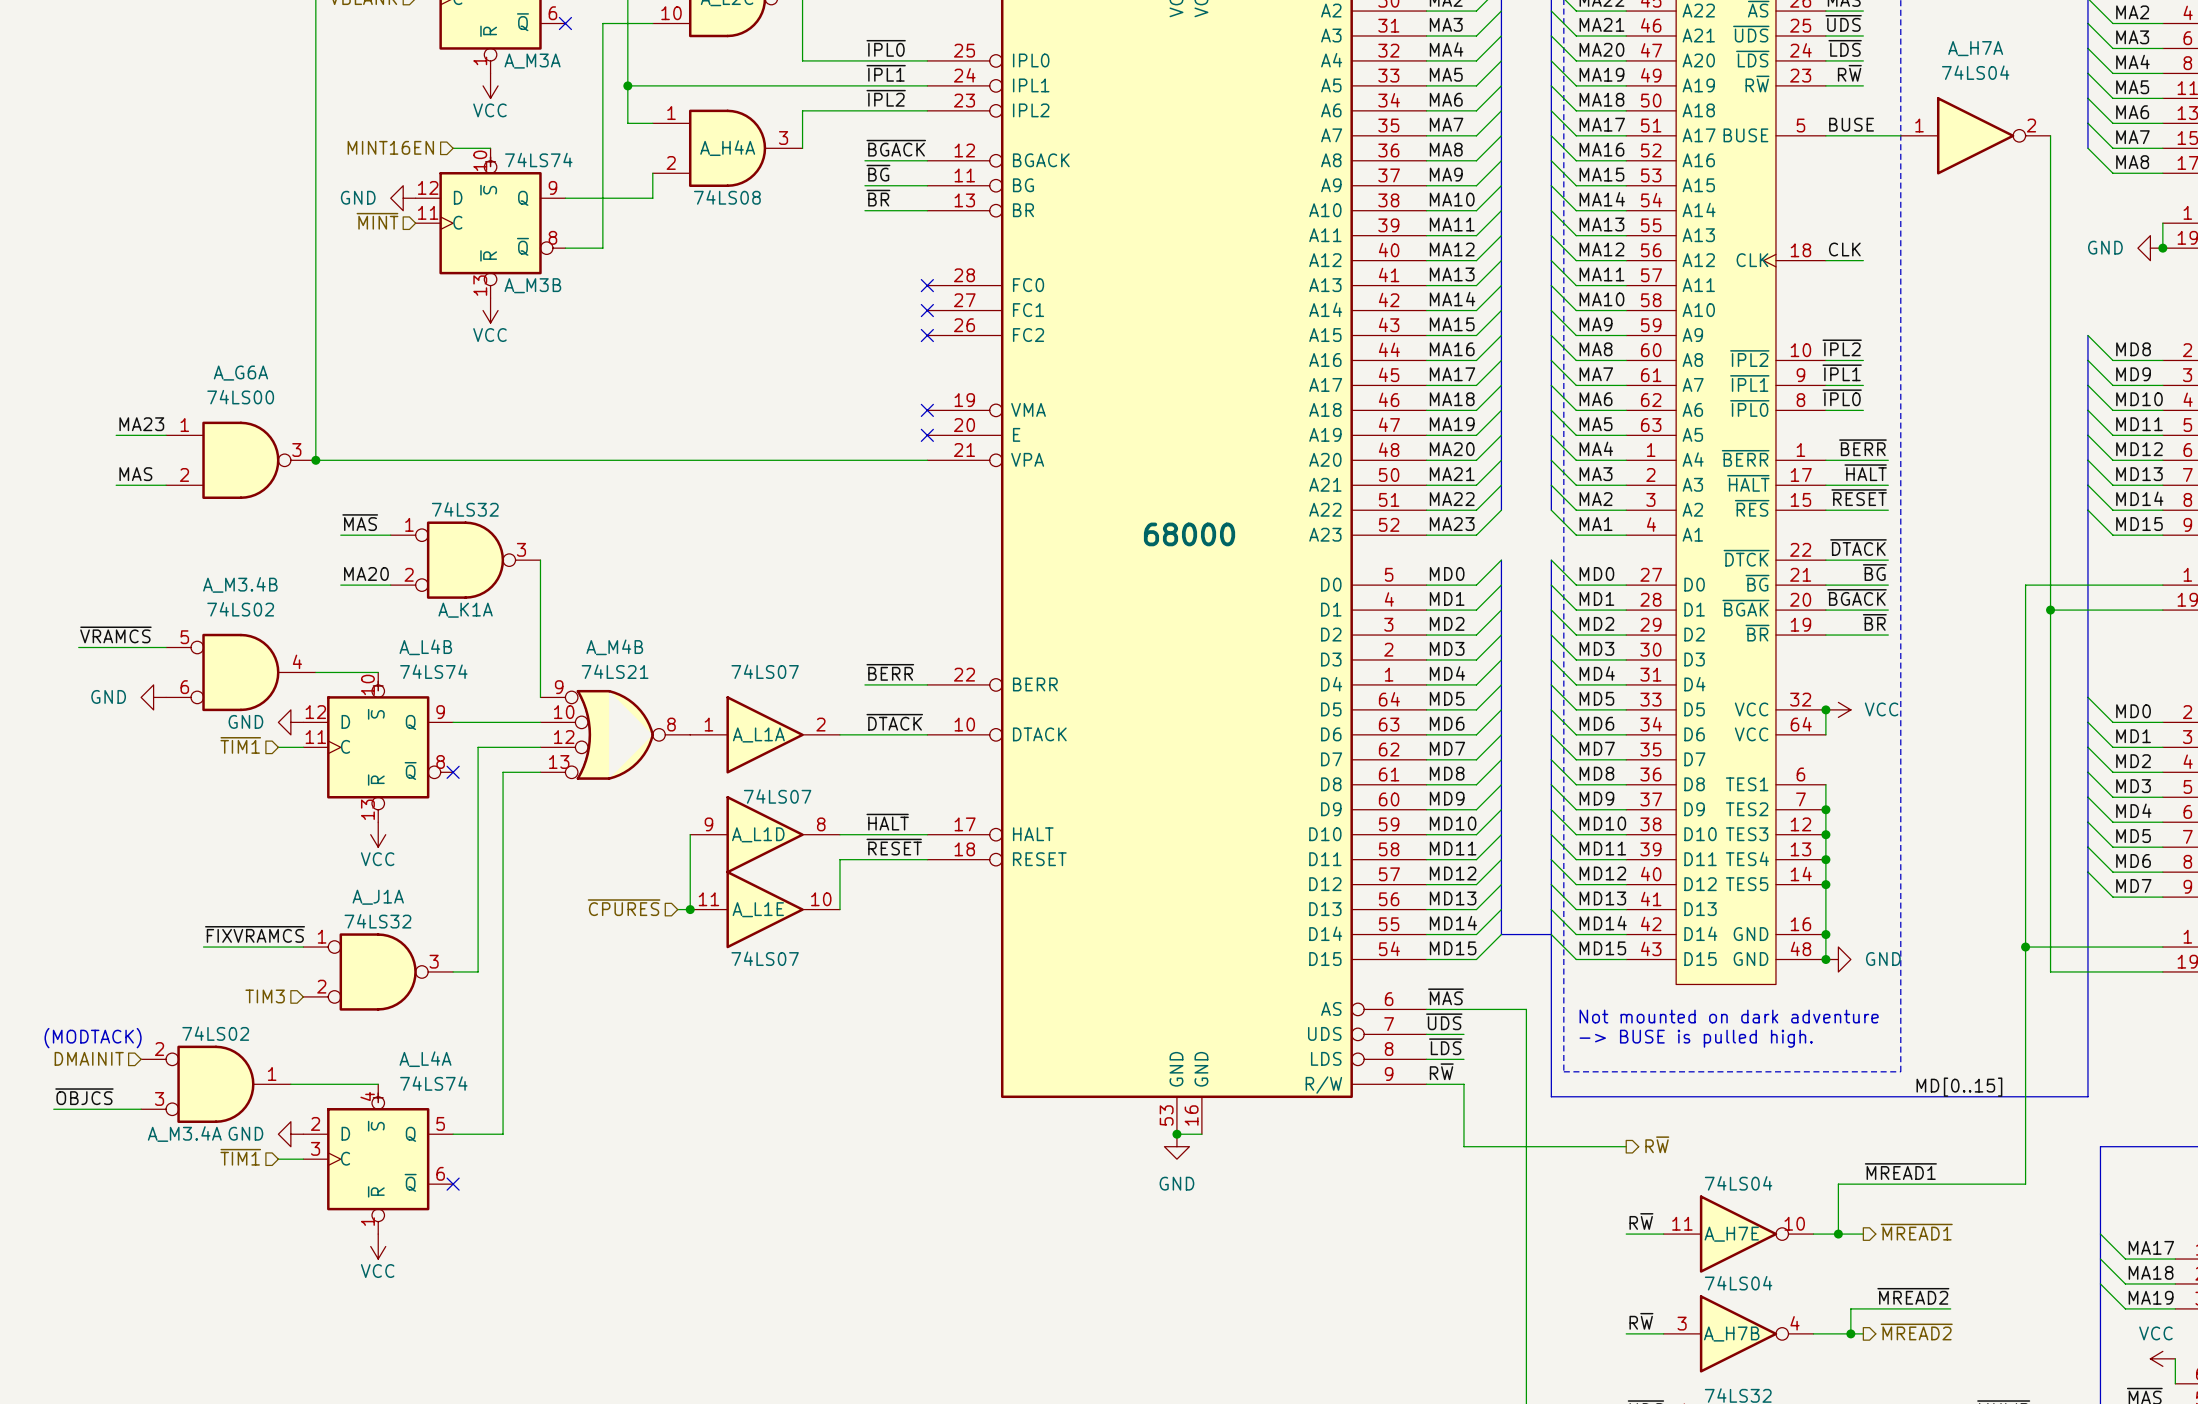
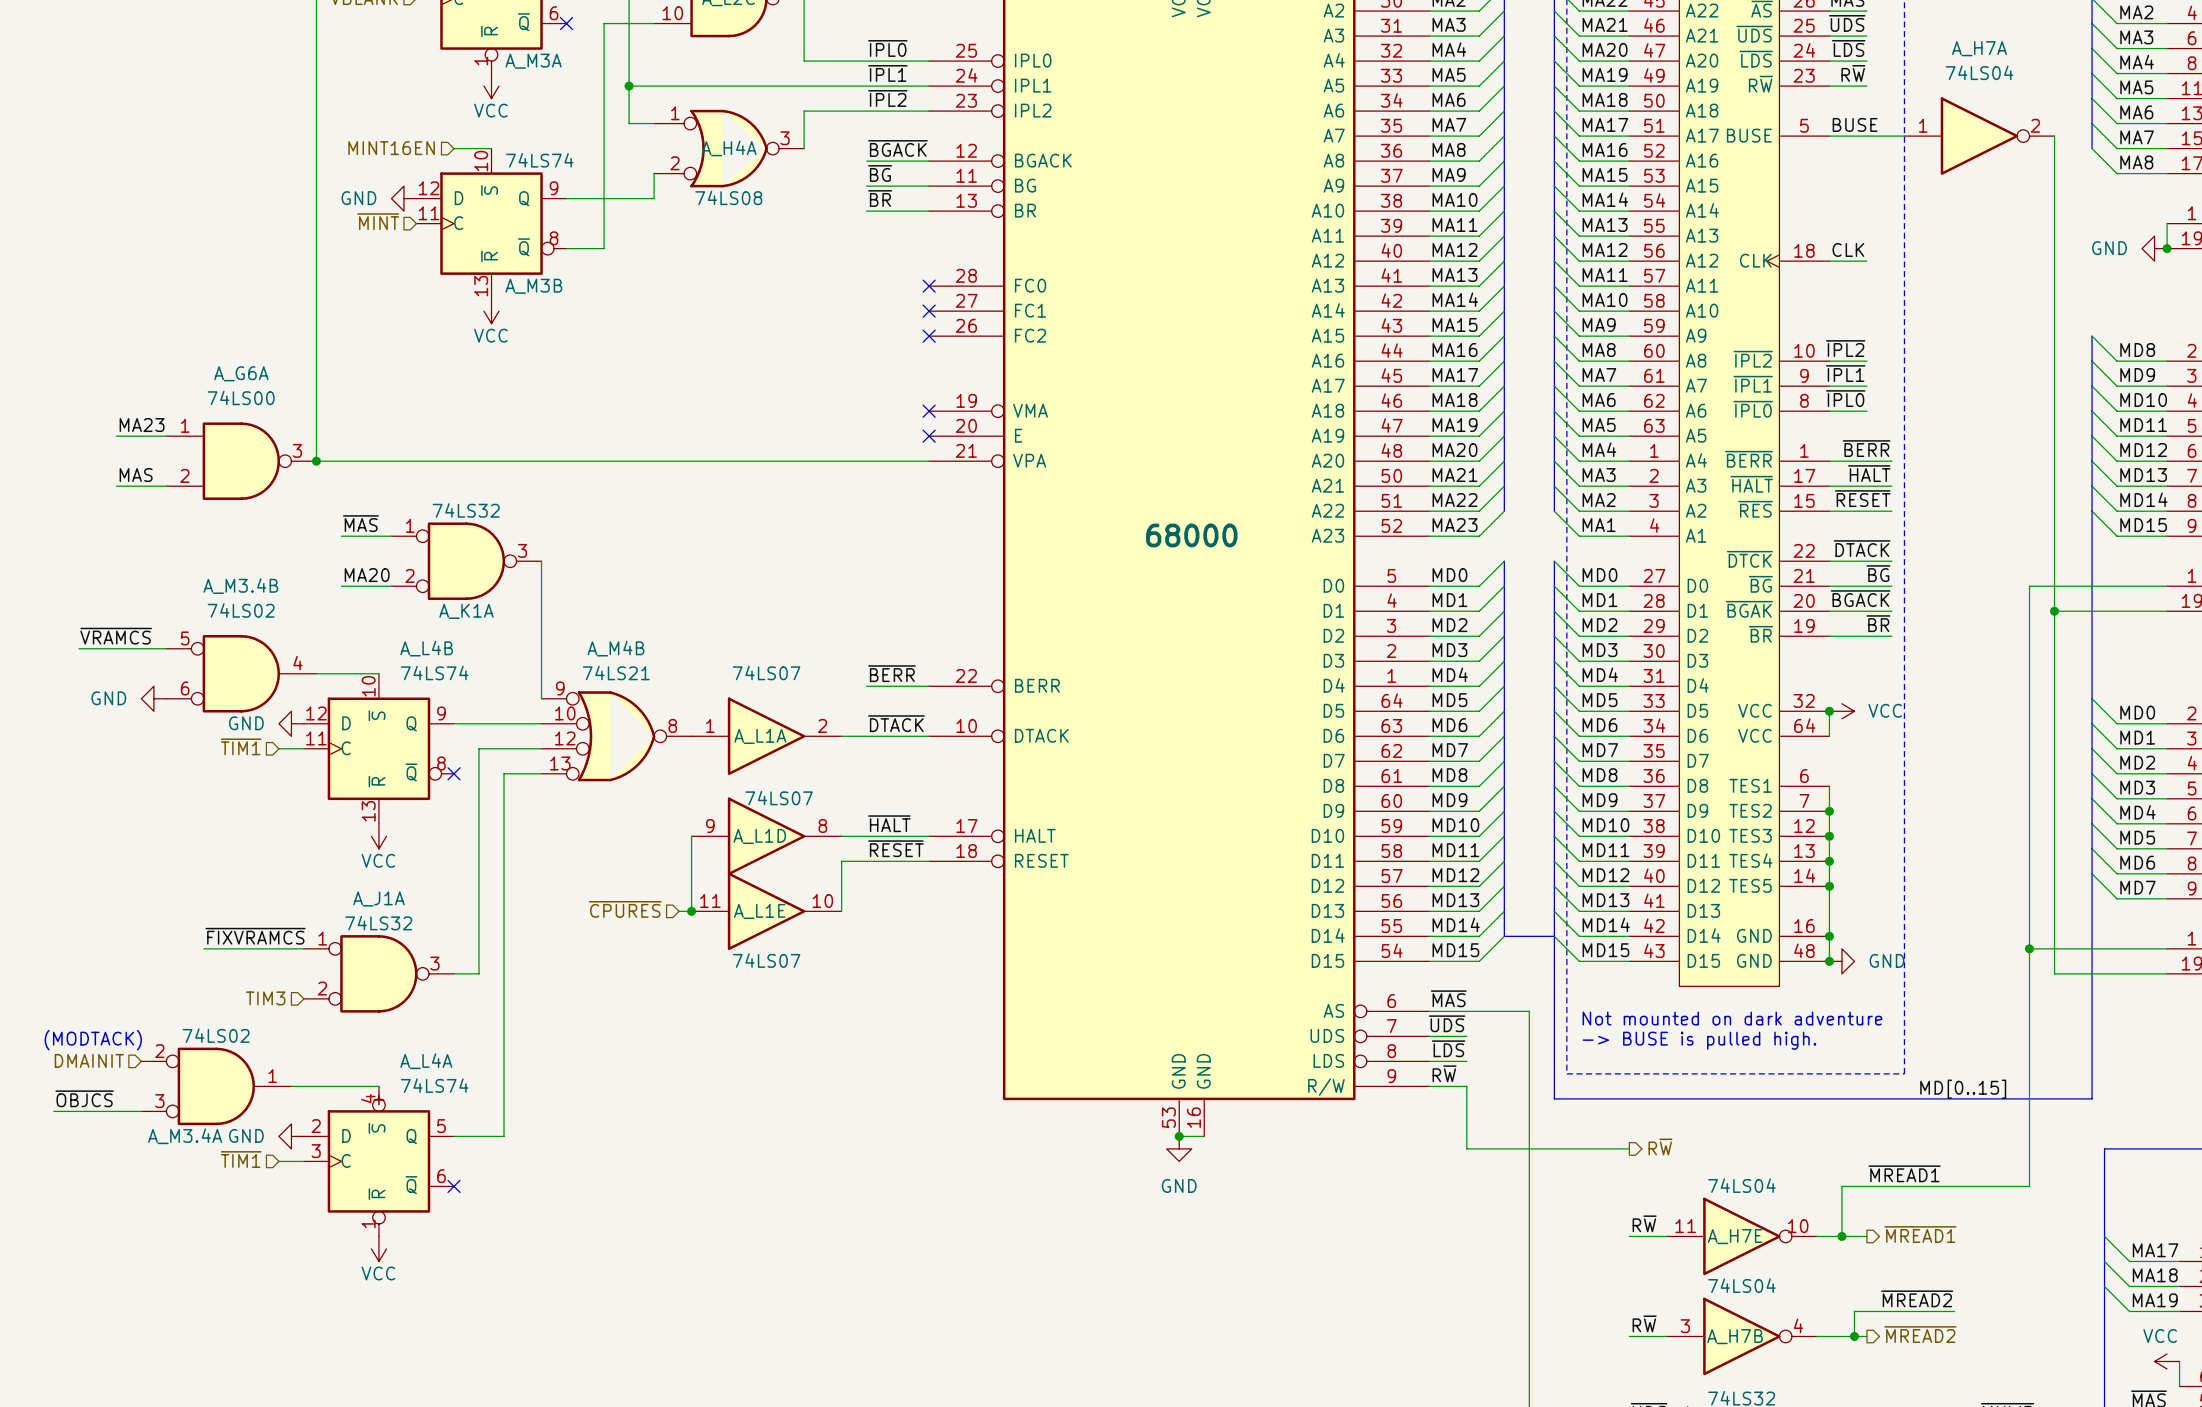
A_H4A symbol: [652, 109, 803, 187] -> [654, 109, 805, 188]
A_M3B symbol: [415, 148, 566, 299] -> [416, 148, 567, 299]
A_L4B symbol: [303, 672, 454, 823] -> [303, 673, 454, 824]

